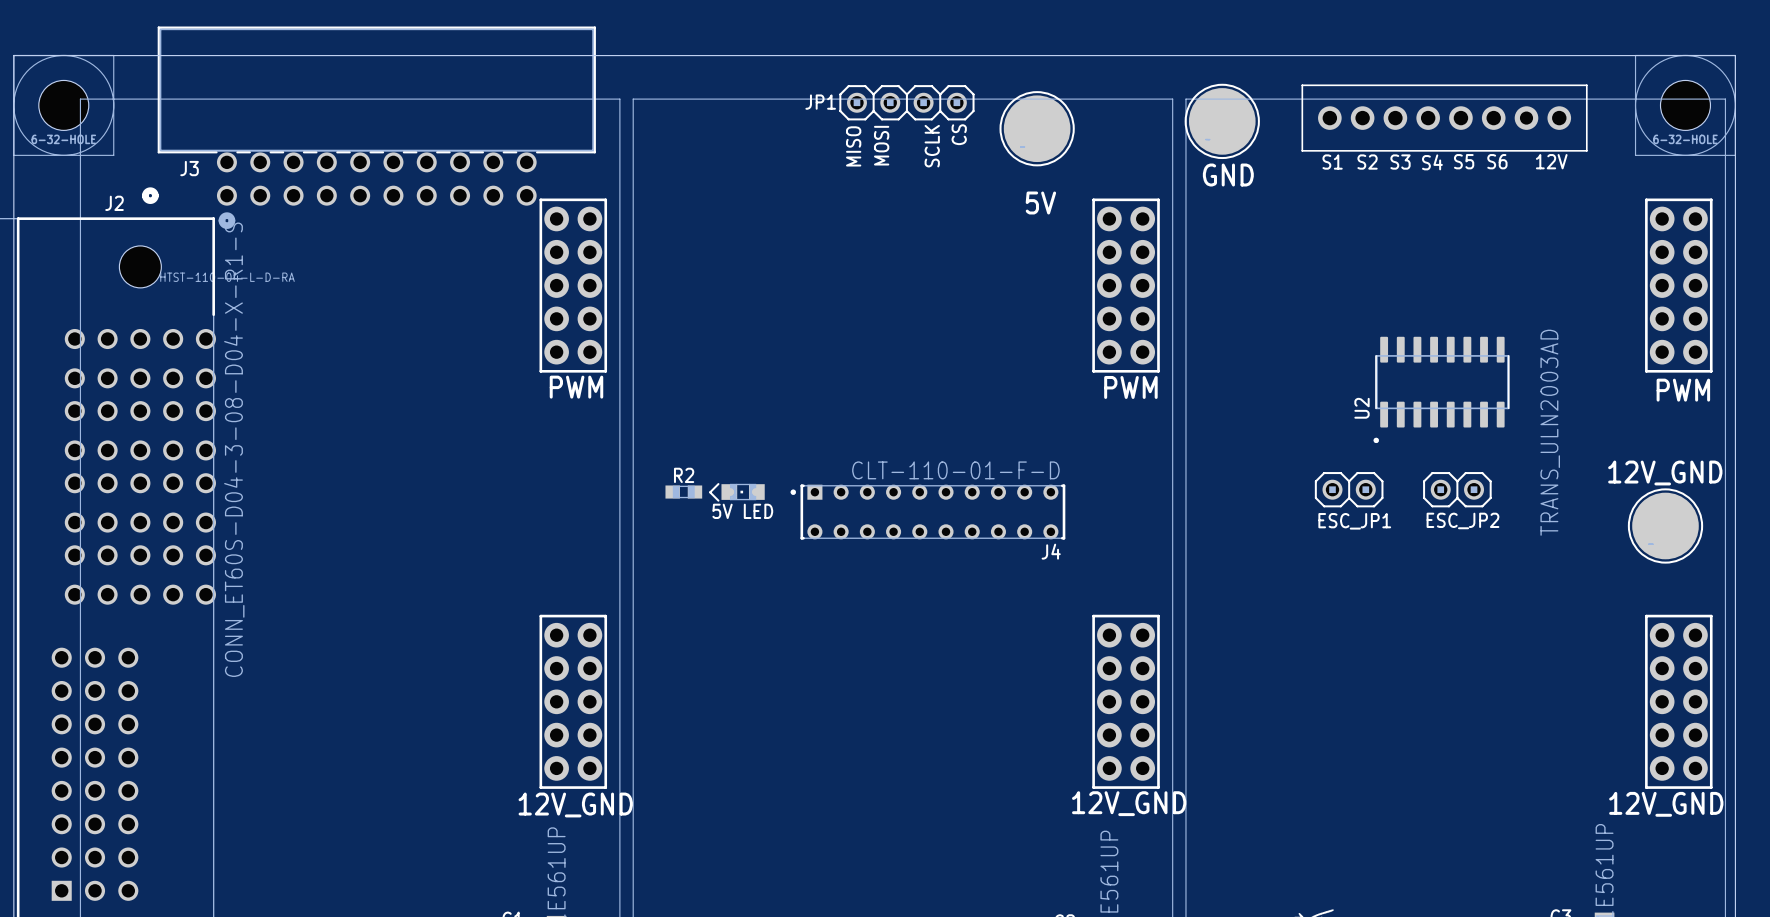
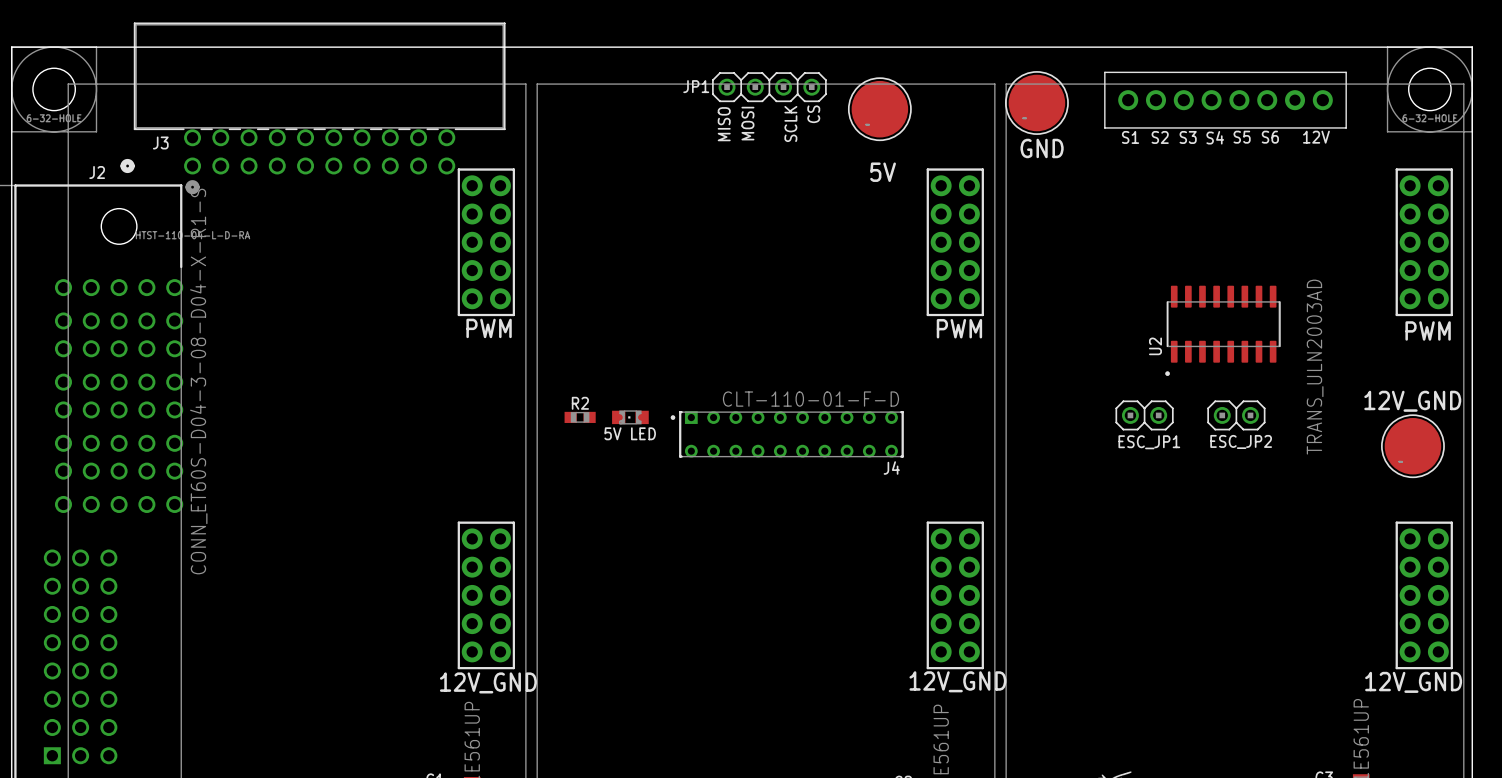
line: (718, 484) (710, 492) (718, 500) -> none

